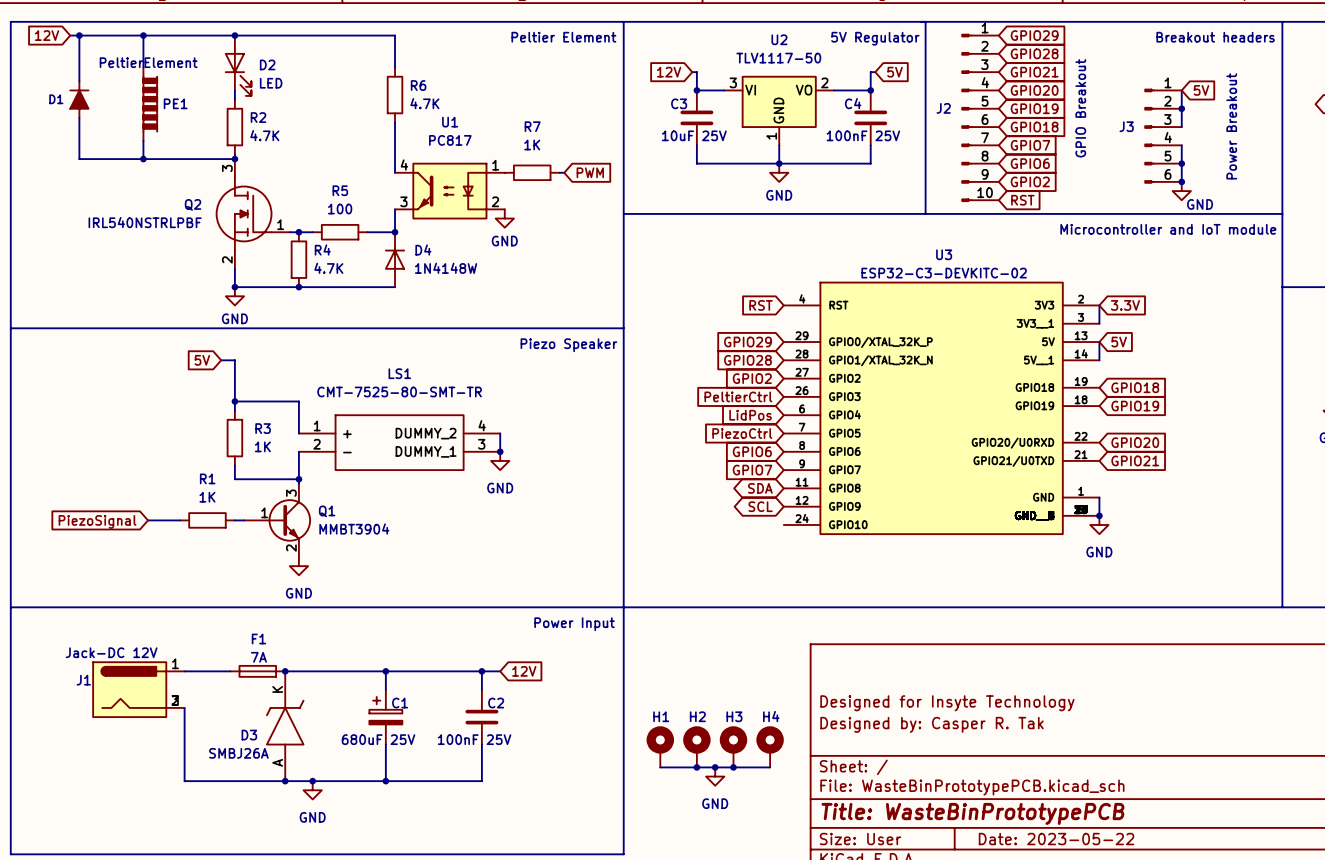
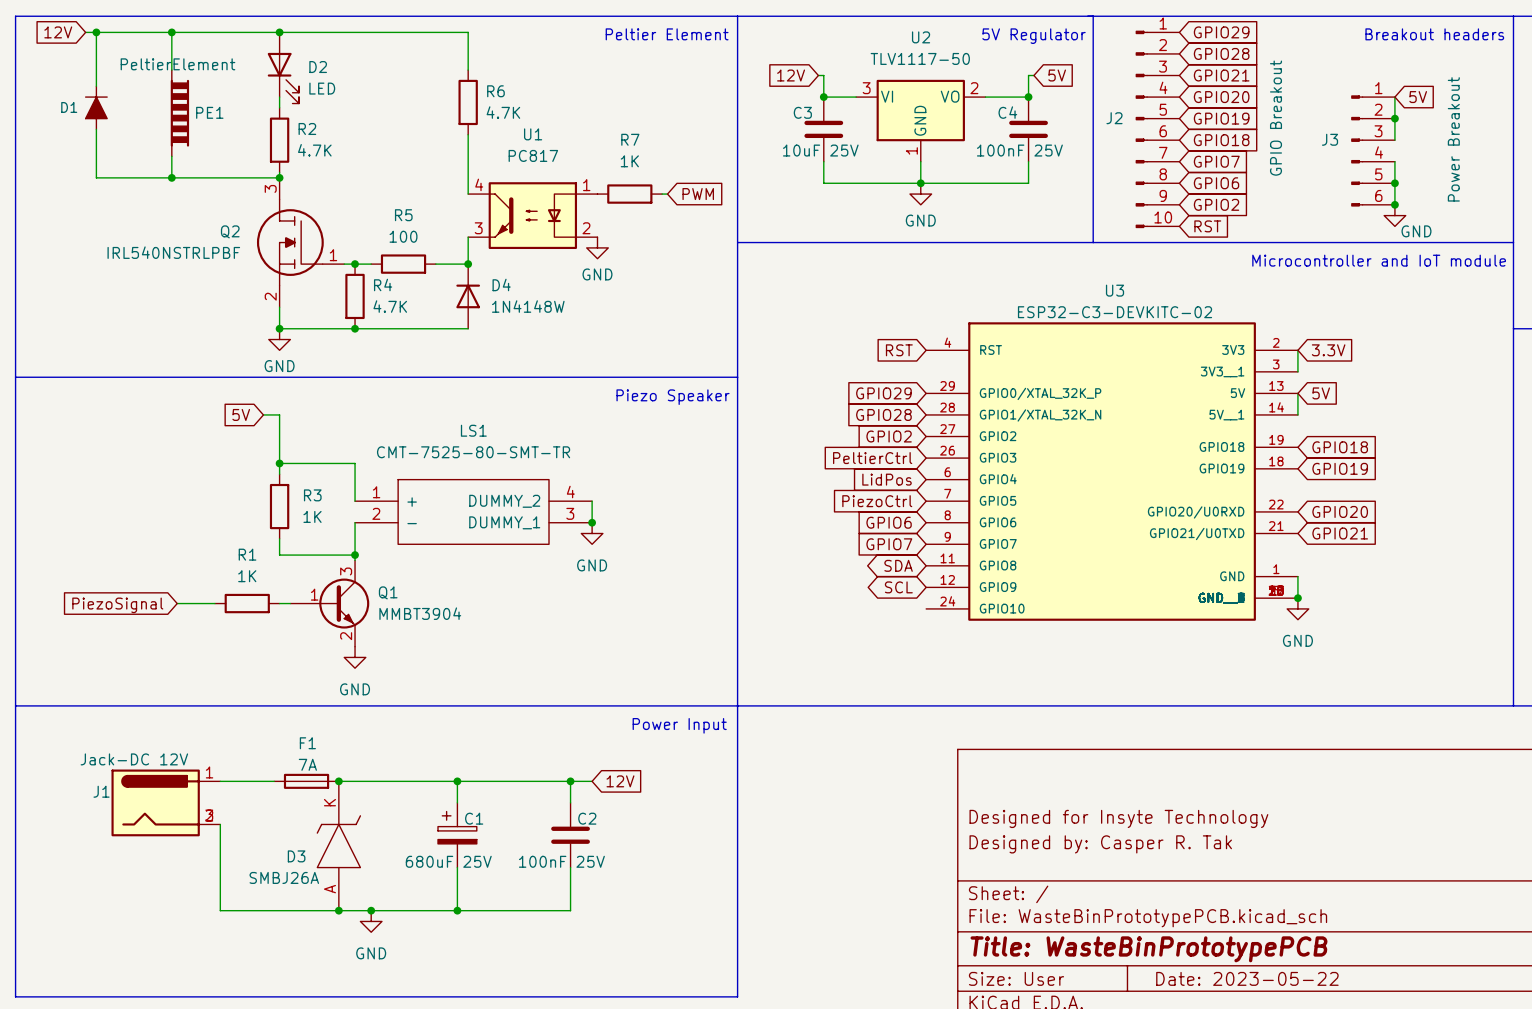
H1: (660, 746) -> none
H2: (696, 746) -> none
H3: (733, 746) -> none
H4: (770, 746) -> none
wire: (660, 767) (770, 767) -> none
junction: (696, 767) -> none
junction: (715, 767) -> none
junction: (733, 767) -> none
power symbol: GND (715, 776) -> none

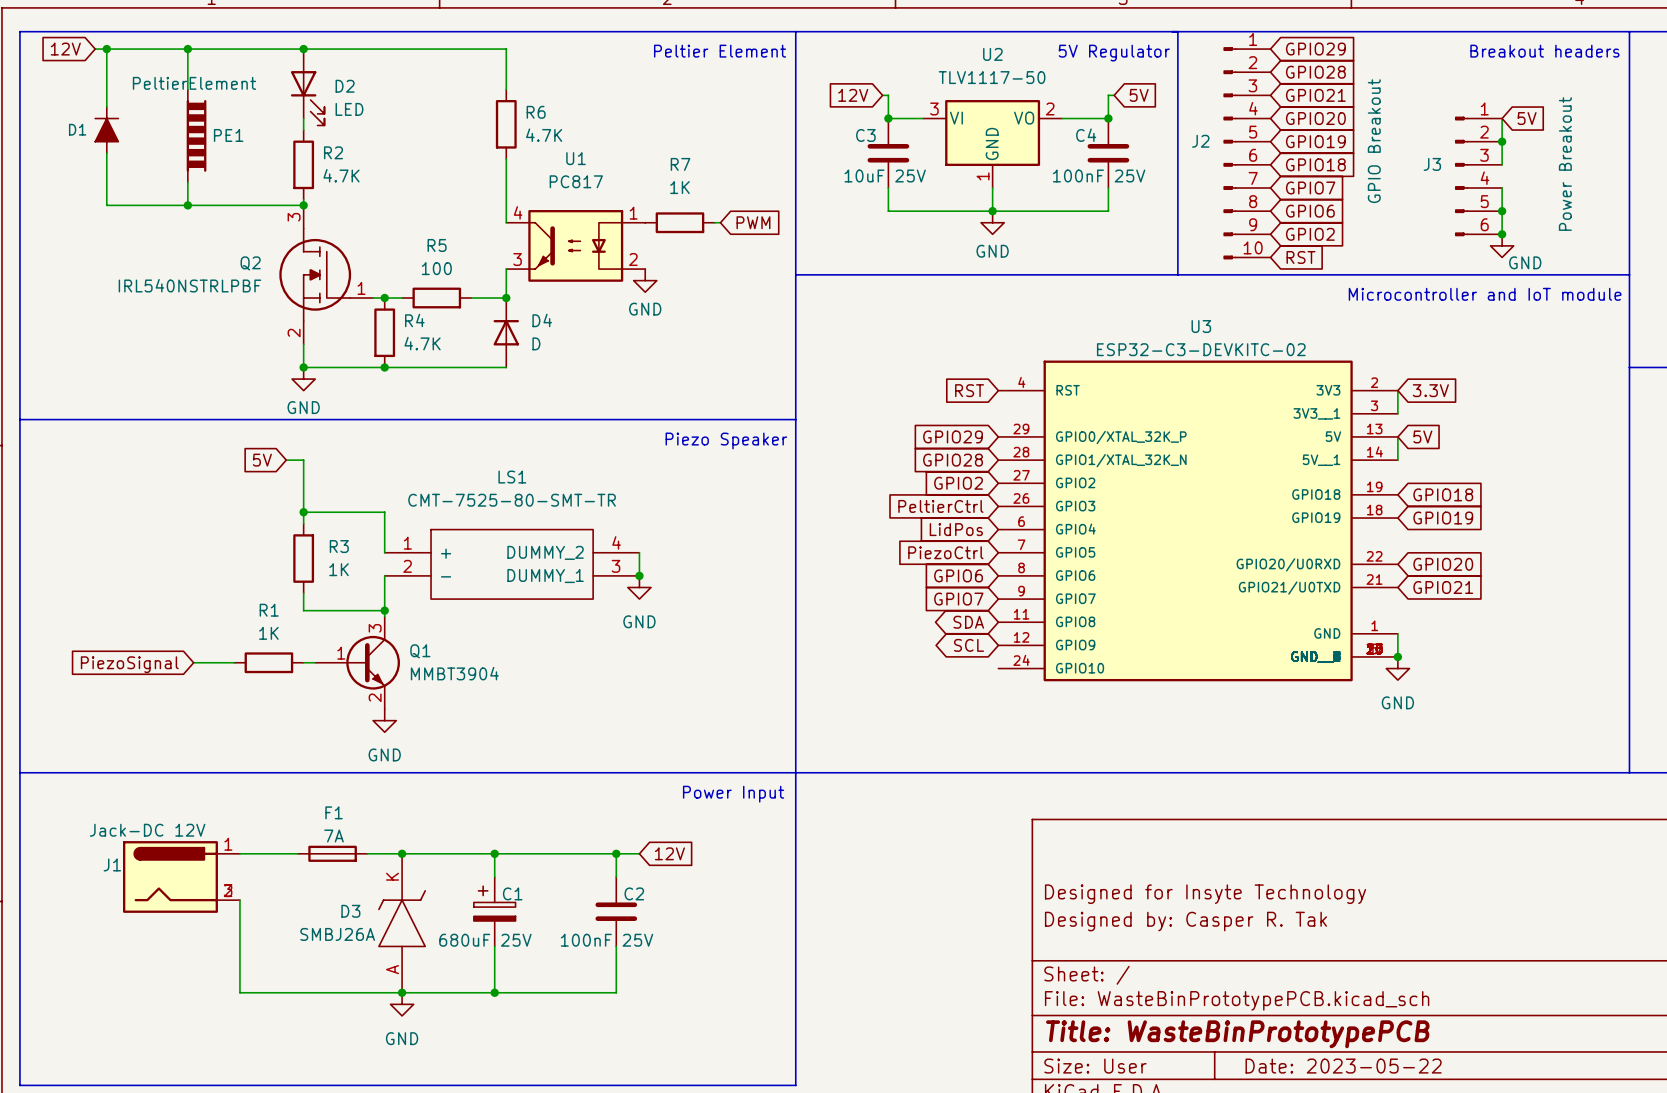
D4 value: 1N4148W (528, 306) -> D (536, 343)
junction position: (338, 781) -> (402, 853)
D3 position: (338, 846) -> (402, 923)
D3 name position: D3 (296, 856) -> D3 (350, 911)
D3 value position: SMBJ26A (284, 877) -> SMBJ26A (337, 934)
junction: (338, 910) -> none

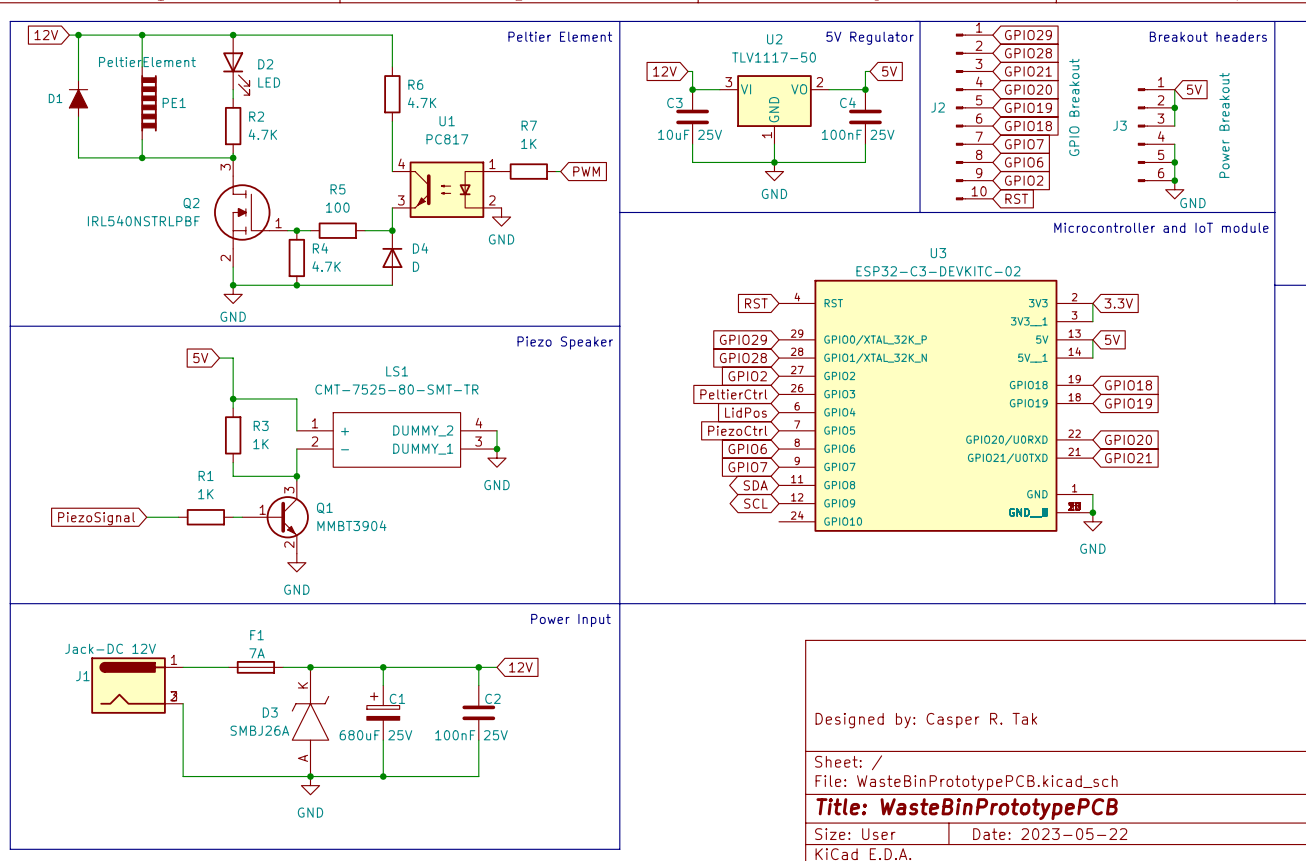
title block: Designed for Insyte Technology (1205, 894) -> none

